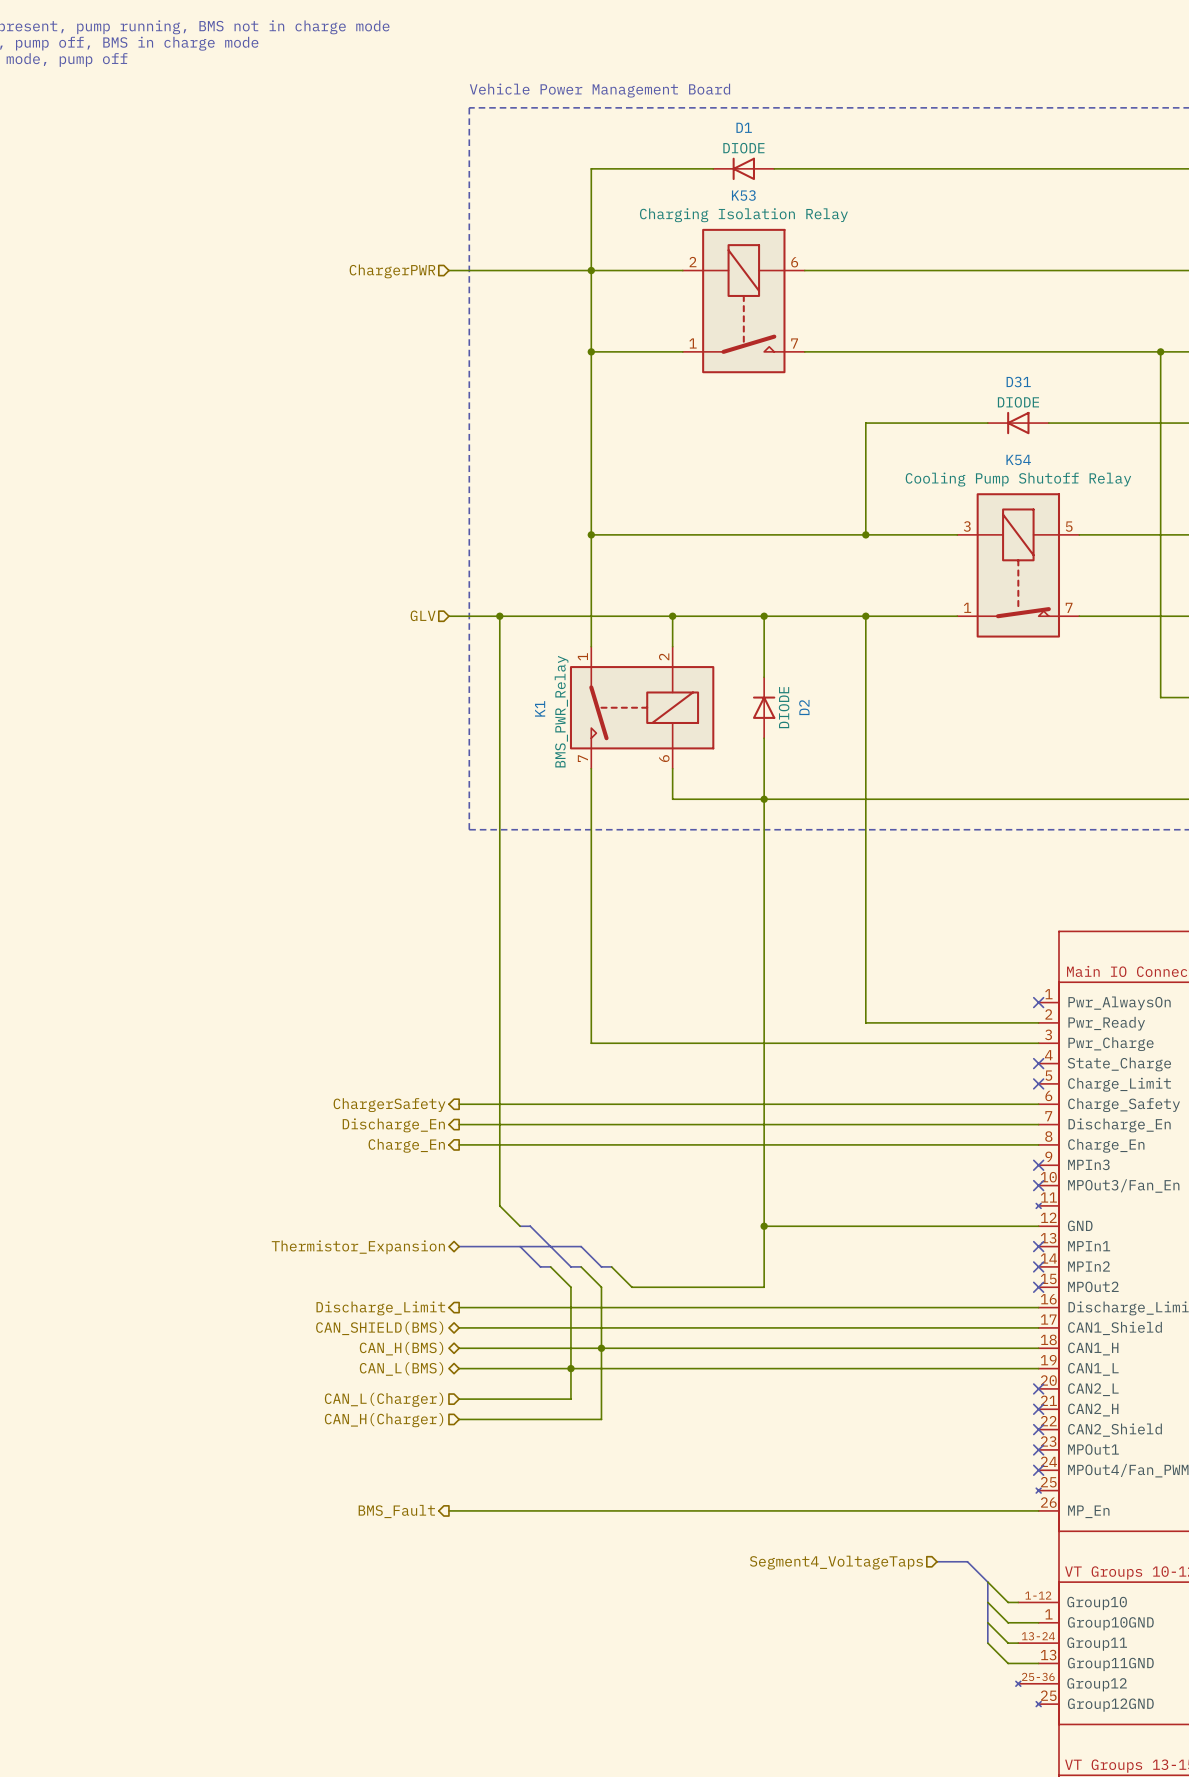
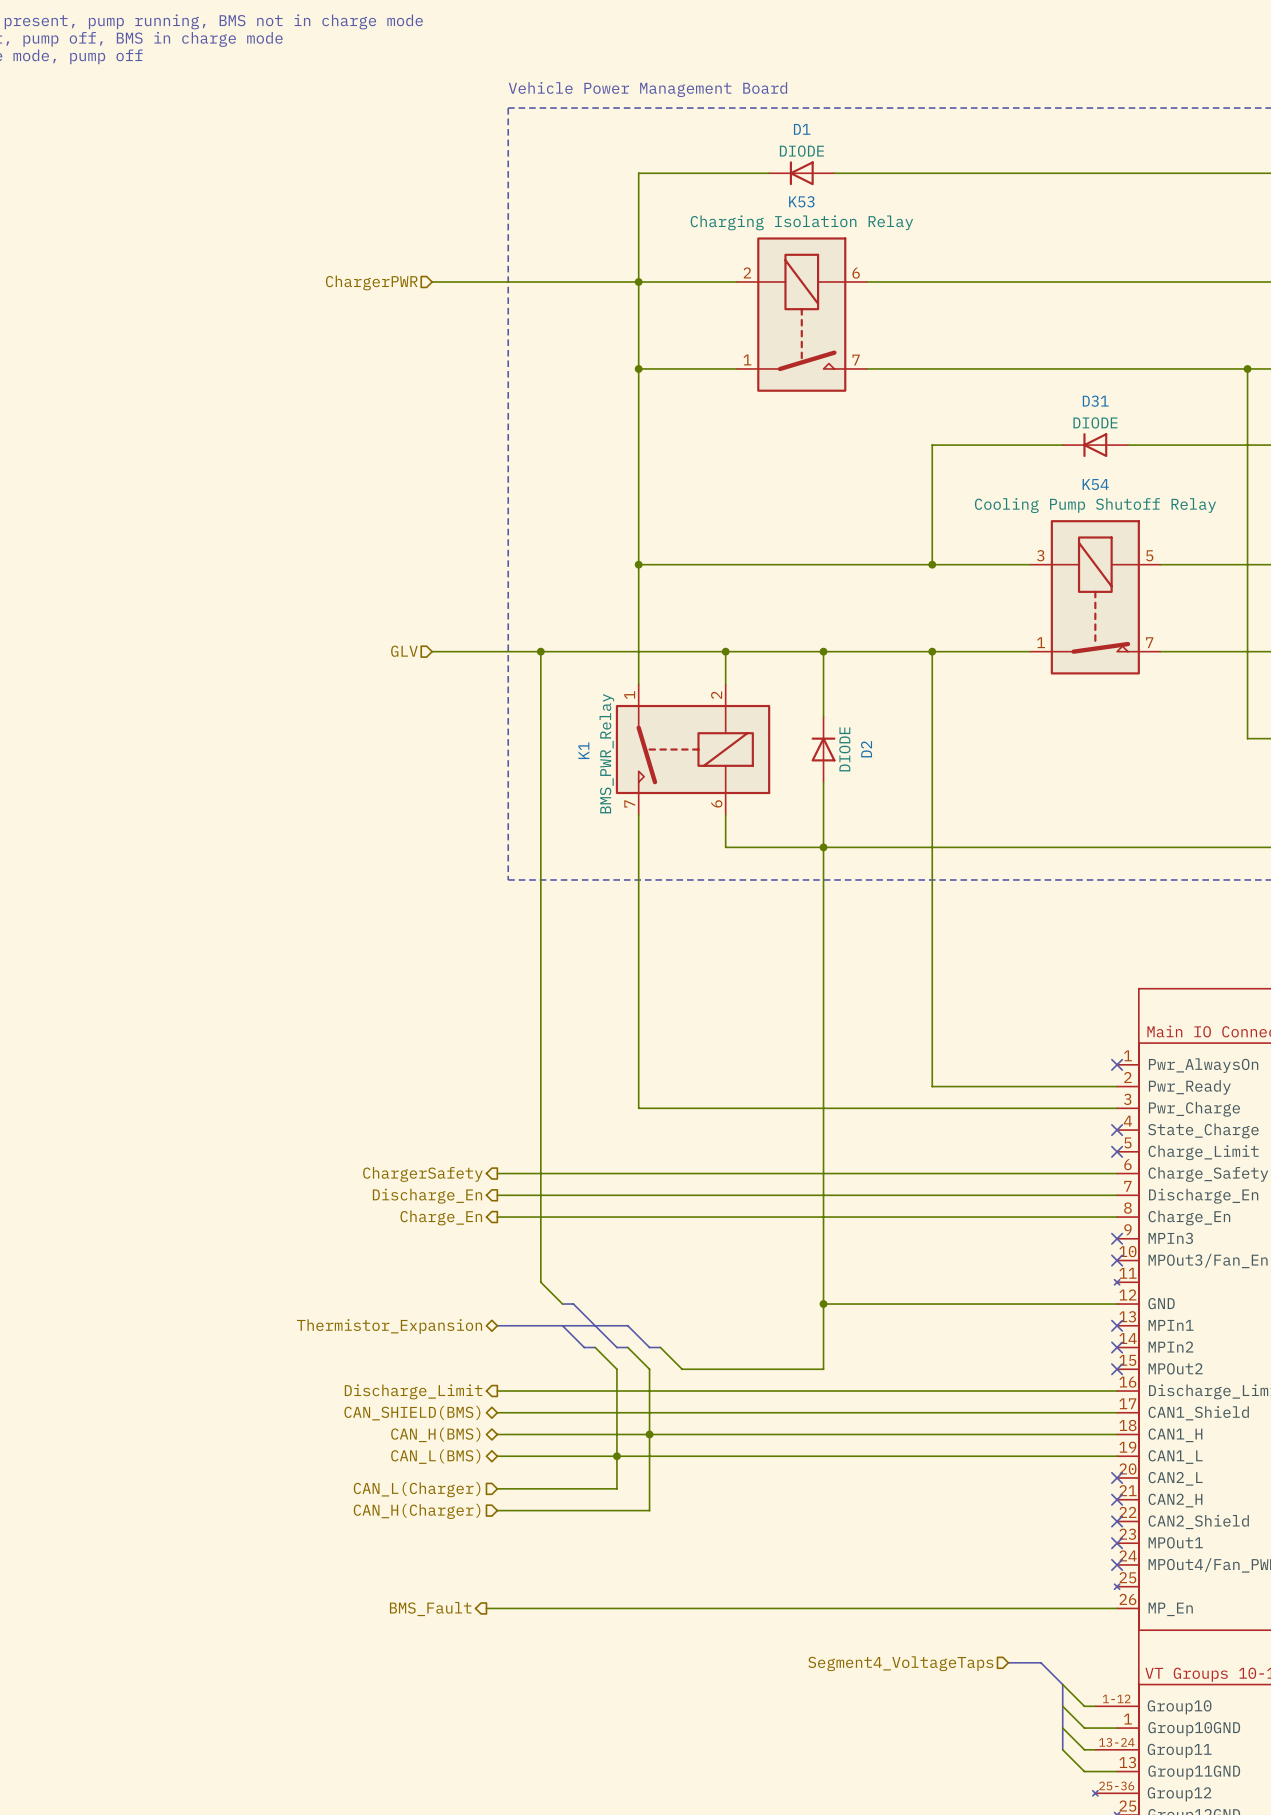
wire: none -> (432, 281) (486, 281)
hierarchical label position: ChargerPWR (392, 271) -> ChargerPWR (371, 282)
hierarchical label position: GLV (423, 615) -> GLV (404, 651)
wire: none -> (432, 651) (486, 651)

